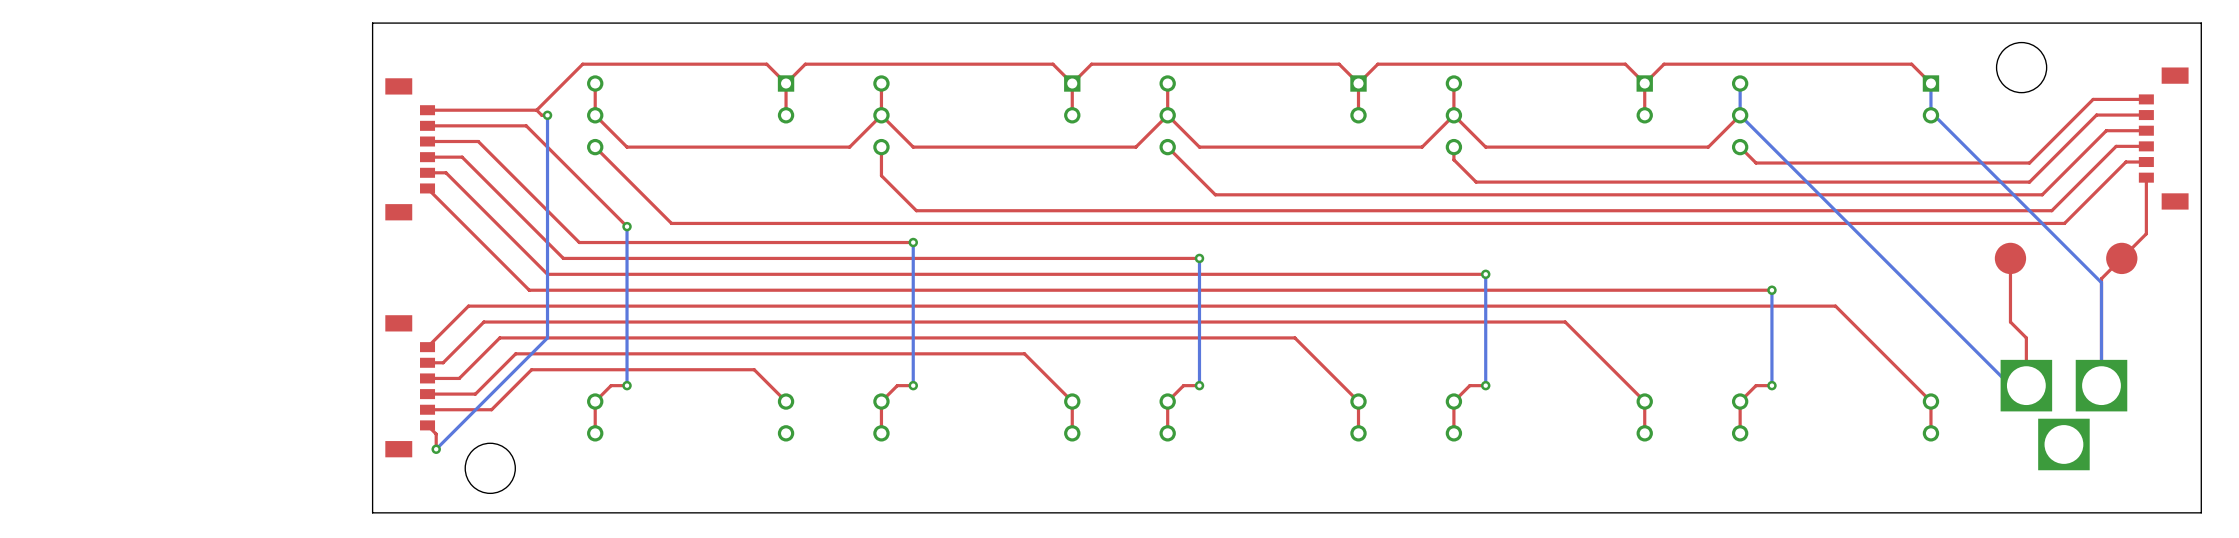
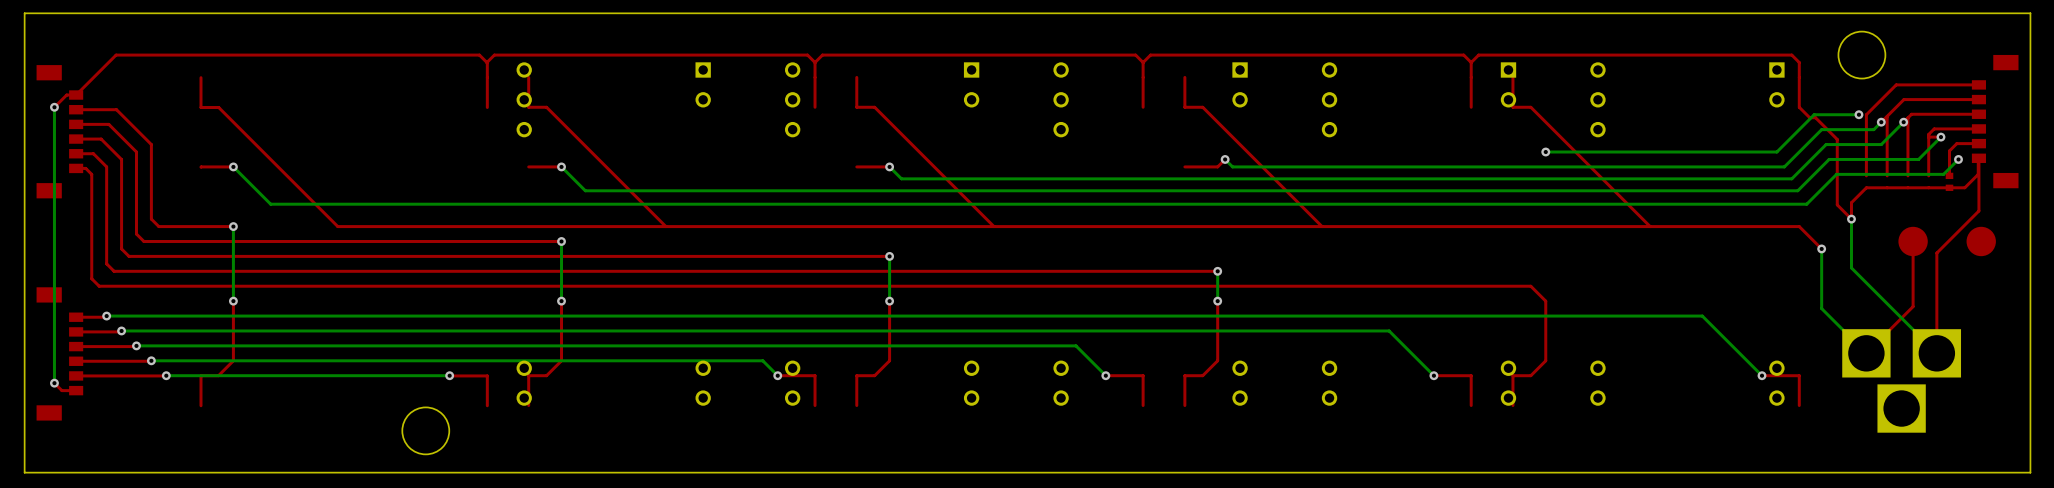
board edge: (372, 23) (372, 512) -> (315, 13) (24, 13) (24, 472) (315, 472)
top track: none -> (815, 62) (815, 107)
top track: none -> (815, 62) (807, 55) (494, 55) (486, 62)
top track: none -> (1143, 62) (1143, 107)
top track: none -> (1143, 62) (1135, 55) (822, 55) (815, 62)
top track: none -> (1471, 62) (1471, 107)
top track: none -> (1471, 62) (1478, 55) (1791, 55) (1799, 62) (1799, 107) (1809, 117) (1815, 117) (1837, 139) (1837, 204) (1851, 219) (1851, 202) (1866, 187) (1964, 187) (1978, 174) (1978, 158)
top track: none -> (1471, 62) (1463, 55) (1150, 55) (1143, 62)
top track: (595, 83) (595, 115) (627, 147) (849, 147) (881, 115) -> none
top track: (786, 83) (786, 115) -> none
top track: (786, 83) (766, 64) (582, 64) (536, 110) -> none
top track: (881, 83) (881, 115) -> none
top track: (1072, 83) (1072, 115) -> none
top track: (1072, 83) (1052, 64) (805, 64) (786, 83) -> none
top track: (1167, 83) (1167, 115) -> none
top track: (1358, 83) (1339, 64) (1091, 64) (1072, 83) -> none
top track: (1358, 83) (1358, 115) -> none
top track: (1453, 83) (1453, 115) -> none
top track: (1644, 83) (1625, 64) (1377, 64) (1358, 83) -> none
top track: (1644, 83) (1644, 115) -> none
bottom track: (1740, 83) (1740, 115) (2010, 385) (2026, 385) -> (1821, 248) (1821, 308) (1866, 353)
top track: (1930, 83) (1911, 64) (1664, 64) (1644, 83) -> none
bottom track: (1930, 83) (1930, 115) (1934, 115) (2101, 282) (2101, 385) -> (1851, 219) (1851, 267) (1936, 353)
top track: none -> (201, 77) (201, 107) (218, 107) (337, 226) (1799, 226) (1821, 248)
top track: none -> (528, 77) (528, 107) (546, 107) (665, 226)
top track: none -> (856, 77) (856, 107) (874, 107) (993, 226)
top track: none -> (1184, 77) (1184, 107) (1202, 107) (1322, 226)
top track: none -> (1512, 77) (1512, 107) (1530, 107) (1650, 226)
top track: (2093, 99) (2029, 163) (1756, 163) (1740, 147) -> (1929, 84) (1896, 84) (1866, 114) (1866, 175)
top track: (536, 110) (427, 110) -> none
top track: (536, 110) (541, 115) (547, 115) -> none
bottom track: (547, 115) (547, 337) (436, 449) -> none
via: (547, 115) -> none
top track: (1167, 115) (1135, 147) (913, 147) (881, 115) -> none
top track: (1453, 115) (1422, 147) (1199, 147) (1167, 115) -> none
top track: (1740, 115) (1708, 147) (1485, 147) (1453, 115) -> none
top track: (2096, 115) (2029, 182) (1476, 182) (1453, 159) (1453, 147) -> (1932, 99) (1903, 99) (1881, 122)
top track: none -> (54, 107) (66, 95) (76, 95) (116, 55) (479, 55) (487, 62) (487, 107)
bottom track: none -> (54, 107) (54, 383)
via: none -> (54, 107)
top track: none -> (76, 109) (116, 109) (151, 144) (151, 219) (158, 226) (233, 226)
top track: (427, 125) (526, 125) (627, 226) -> none
top track: (2106, 130) (2042, 194) (1215, 194) (1167, 147) -> (1941, 114) (1911, 114) (1903, 122)
bottom track: none -> (1858, 114) (1814, 114) (1776, 152) (1545, 152)
via: none -> (1858, 114)
top track: none -> (1887, 116) (1887, 175)
top track: none -> (1907, 117) (1907, 175)
bottom track: none -> (1881, 122) (1873, 129) (1821, 129) (1784, 166) (1232, 166) (1225, 159)
via: none -> (1881, 122)
bottom track: none -> (1903, 122) (1881, 144) (1826, 144) (1791, 178) (901, 178) (889, 166)
via: none -> (1903, 122)
top track: none -> (76, 124) (108, 124) (136, 152) (136, 234) (143, 241) (561, 241)
top track: (427, 141) (478, 141) (579, 242) (913, 242) -> none
top track: (2116, 146) (2051, 210) (916, 210) (881, 175) (881, 147) -> (1950, 128) (1934, 128) (1928, 134) (1928, 175)
top track: (595, 147) (671, 223) (2064, 223) (2125, 162) -> (1949, 175) (1949, 150) (1956, 143) (1959, 143)
part: none -> (59, 131)
part: (410, 149) -> none
top track: none -> (1940, 137) (1928, 137)
bottom track: none -> (1940, 137) (1918, 159) (1829, 159) (1797, 190) (585, 190) (561, 166)
via: none -> (1940, 137)
top track: none -> (76, 139) (101, 139) (121, 159) (121, 248) (129, 256) (889, 256)
top track: (427, 157) (462, 157) (563, 258) (1199, 258) -> none
via: none -> (1545, 152)
top track: none -> (76, 153) (93, 153) (106, 166) (106, 263) (114, 271) (1217, 271)
top track: (427, 172) (445, 172) (547, 274) (1485, 274) -> none
top track: none -> (1225, 159) (1217, 166) (1184, 166)
via: none -> (1225, 159)
bottom track: none -> (1958, 159) (1943, 174) (1836, 174) (1806, 204) (270, 204) (233, 166)
via: none -> (1958, 159)
top track: none -> (233, 166) (201, 167)
via: none -> (233, 166)
top track: none -> (561, 166) (528, 166)
via: none -> (561, 166)
top track: none -> (889, 166) (856, 166)
via: none -> (889, 166)
top track: none -> (76, 168) (85, 168) (91, 174) (91, 278) (99, 286) (1530, 286) (1545, 301) (1545, 360) (1530, 375) (1512, 375) (1512, 405)
top track: (427, 188) (529, 290) (1771, 290) -> none
part: none -> (1949, 181)
bottom track: (627, 226) (627, 385) -> none
via: (627, 226) -> none
bottom track: (913, 242) (913, 385) -> none
via: (913, 242) -> none
via: none -> (1851, 219)
bottom track: none -> (233, 226) (233, 301)
via: none -> (233, 226)
bottom track: (1199, 258) (1199, 385) -> none
via: (1199, 258) -> none
top track: (2010, 258) (2010, 322) (2026, 337) (2026, 385) -> (1913, 241) (1913, 306) (1866, 353)
part: (2010, 258) -> none
part: (2121, 258) -> none
bottom track: none -> (561, 241) (561, 301)
via: none -> (561, 241)
part: none -> (1913, 241)
part: none -> (1981, 241)
bottom track: (1485, 274) (1485, 385) -> none
via: (1485, 274) -> none
via: none -> (1821, 248)
bottom track: none -> (889, 256) (889, 301)
via: none -> (889, 256)
bottom track: (1771, 290) (1771, 385) -> none
via: (1771, 290) -> none
bottom track: none -> (1217, 271) (1217, 301)
via: none -> (1217, 271)
top track: none -> (233, 301) (233, 360) (218, 375) (201, 375) (201, 405)
via: none -> (233, 301)
top track: none -> (561, 301) (561, 360) (546, 375) (528, 375) (528, 405)
via: none -> (561, 301)
top track: none -> (889, 301) (889, 360) (874, 375) (856, 375) (856, 405)
via: none -> (889, 301)
top track: none -> (1217, 301) (1217, 360) (1202, 375) (1184, 375) (1184, 405)
via: none -> (1217, 301)
top track: none -> (106, 316) (76, 317)
bottom track: none -> (106, 316) (1702, 316) (1762, 375)
via: none -> (106, 316)
top track: (427, 347) (468, 306) (1835, 306) (1930, 401) (1930, 433) -> none
top track: none -> (121, 330) (76, 331)
bottom track: none -> (121, 330) (1389, 330) (1433, 375)
via: none -> (121, 330)
top track: (427, 362) (443, 362) (483, 322) (1565, 322) (1644, 401) (1644, 433) -> none
top track: none -> (136, 345) (76, 346)
bottom track: none -> (136, 345) (1076, 345) (1105, 375)
via: none -> (136, 345)
top track: (427, 378) (459, 378) (499, 337) (1294, 337) (1358, 401) (1358, 433) -> none
top track: (627, 385) (611, 385) (595, 401) (595, 433) -> none
via: (627, 385) -> none
top track: (913, 385) (897, 385) (881, 401) (881, 433) -> none
via: (913, 385) -> none
top track: (1199, 385) (1183, 385) (1167, 401) (1167, 433) -> none
via position: (1199, 385) -> (1105, 375)
top track: (1485, 385) (1469, 385) (1453, 401) (1453, 433) -> none
via: (1485, 385) -> none
top track: (1771, 385) (1756, 385) (1740, 401) (1740, 433) -> none
via: (1771, 385) -> none
part: none -> (59, 353)
part: (410, 386) -> none
top track: none -> (151, 360) (76, 361)
bottom track: none -> (151, 360) (762, 360) (777, 375)
via: none -> (151, 360)
top track: (427, 394) (475, 394) (515, 353) (1024, 353) (1072, 401) (1072, 433) -> none
top track: (786, 401) (754, 369) (531, 369) (491, 409) (427, 409) -> none
top track: none -> (166, 375) (76, 375)
via: none -> (166, 375)
top track: none -> (449, 375) (487, 375) (487, 405)
bottom track: none -> (449, 375) (166, 375)
via: none -> (449, 375)
top track: none -> (777, 375) (815, 375) (815, 405)
via: none -> (777, 375)
top track: none -> (1105, 375) (1143, 375) (1143, 405)
top track: none -> (1433, 375) (1471, 375) (1471, 405)
via: none -> (1433, 375)
top track: none -> (1762, 375) (1799, 375) (1799, 405)
via: none -> (1762, 375)
top track: none -> (54, 383) (61, 390) (76, 390)
via: none -> (54, 383)
top track: (427, 425) (436, 434) (436, 449) -> none
via: (436, 449) -> none

